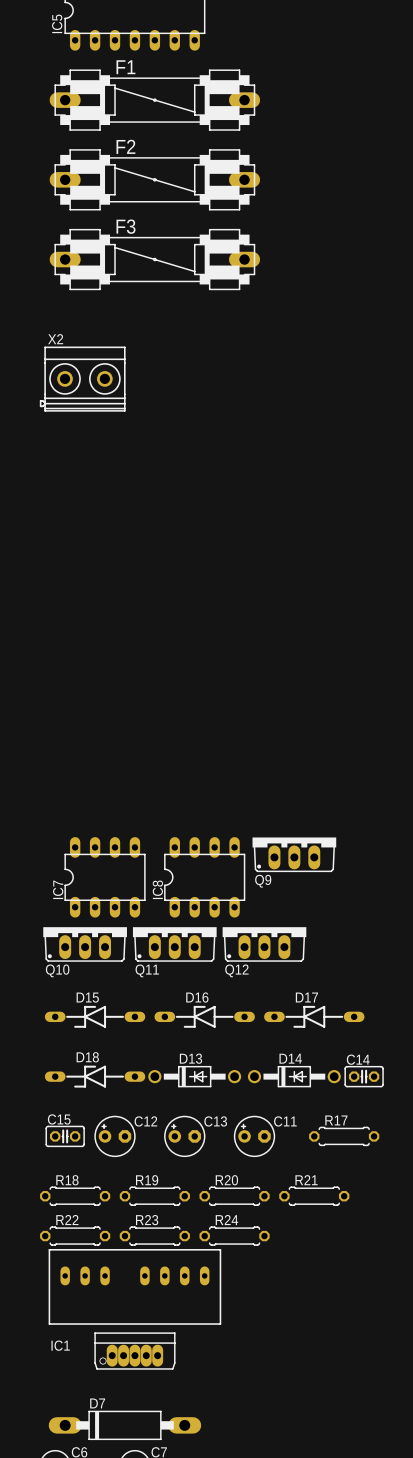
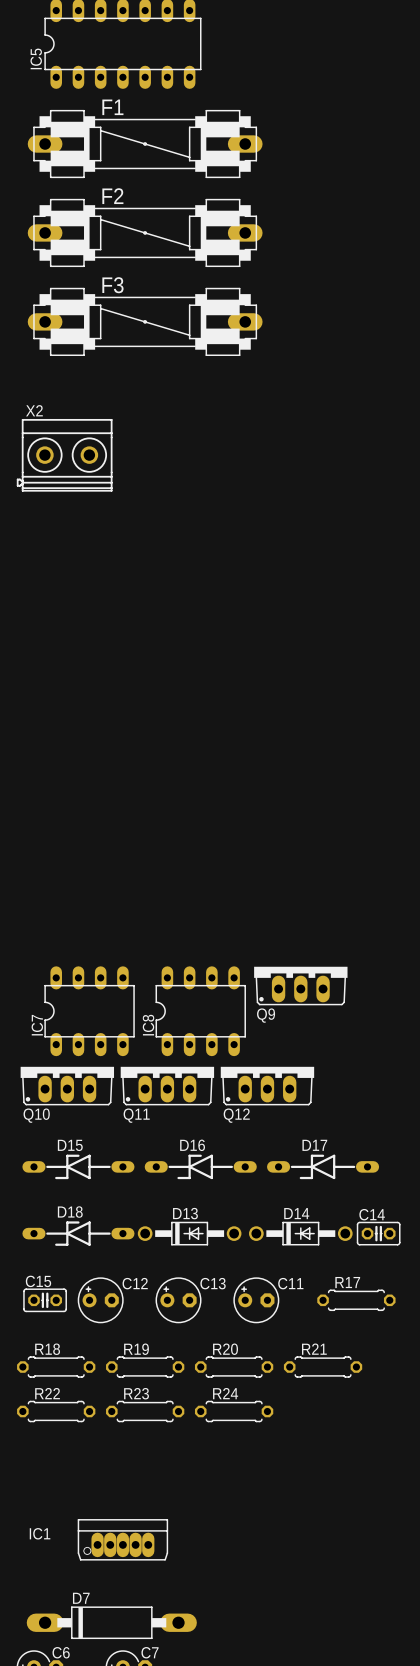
part: (134, 1286) -> none

